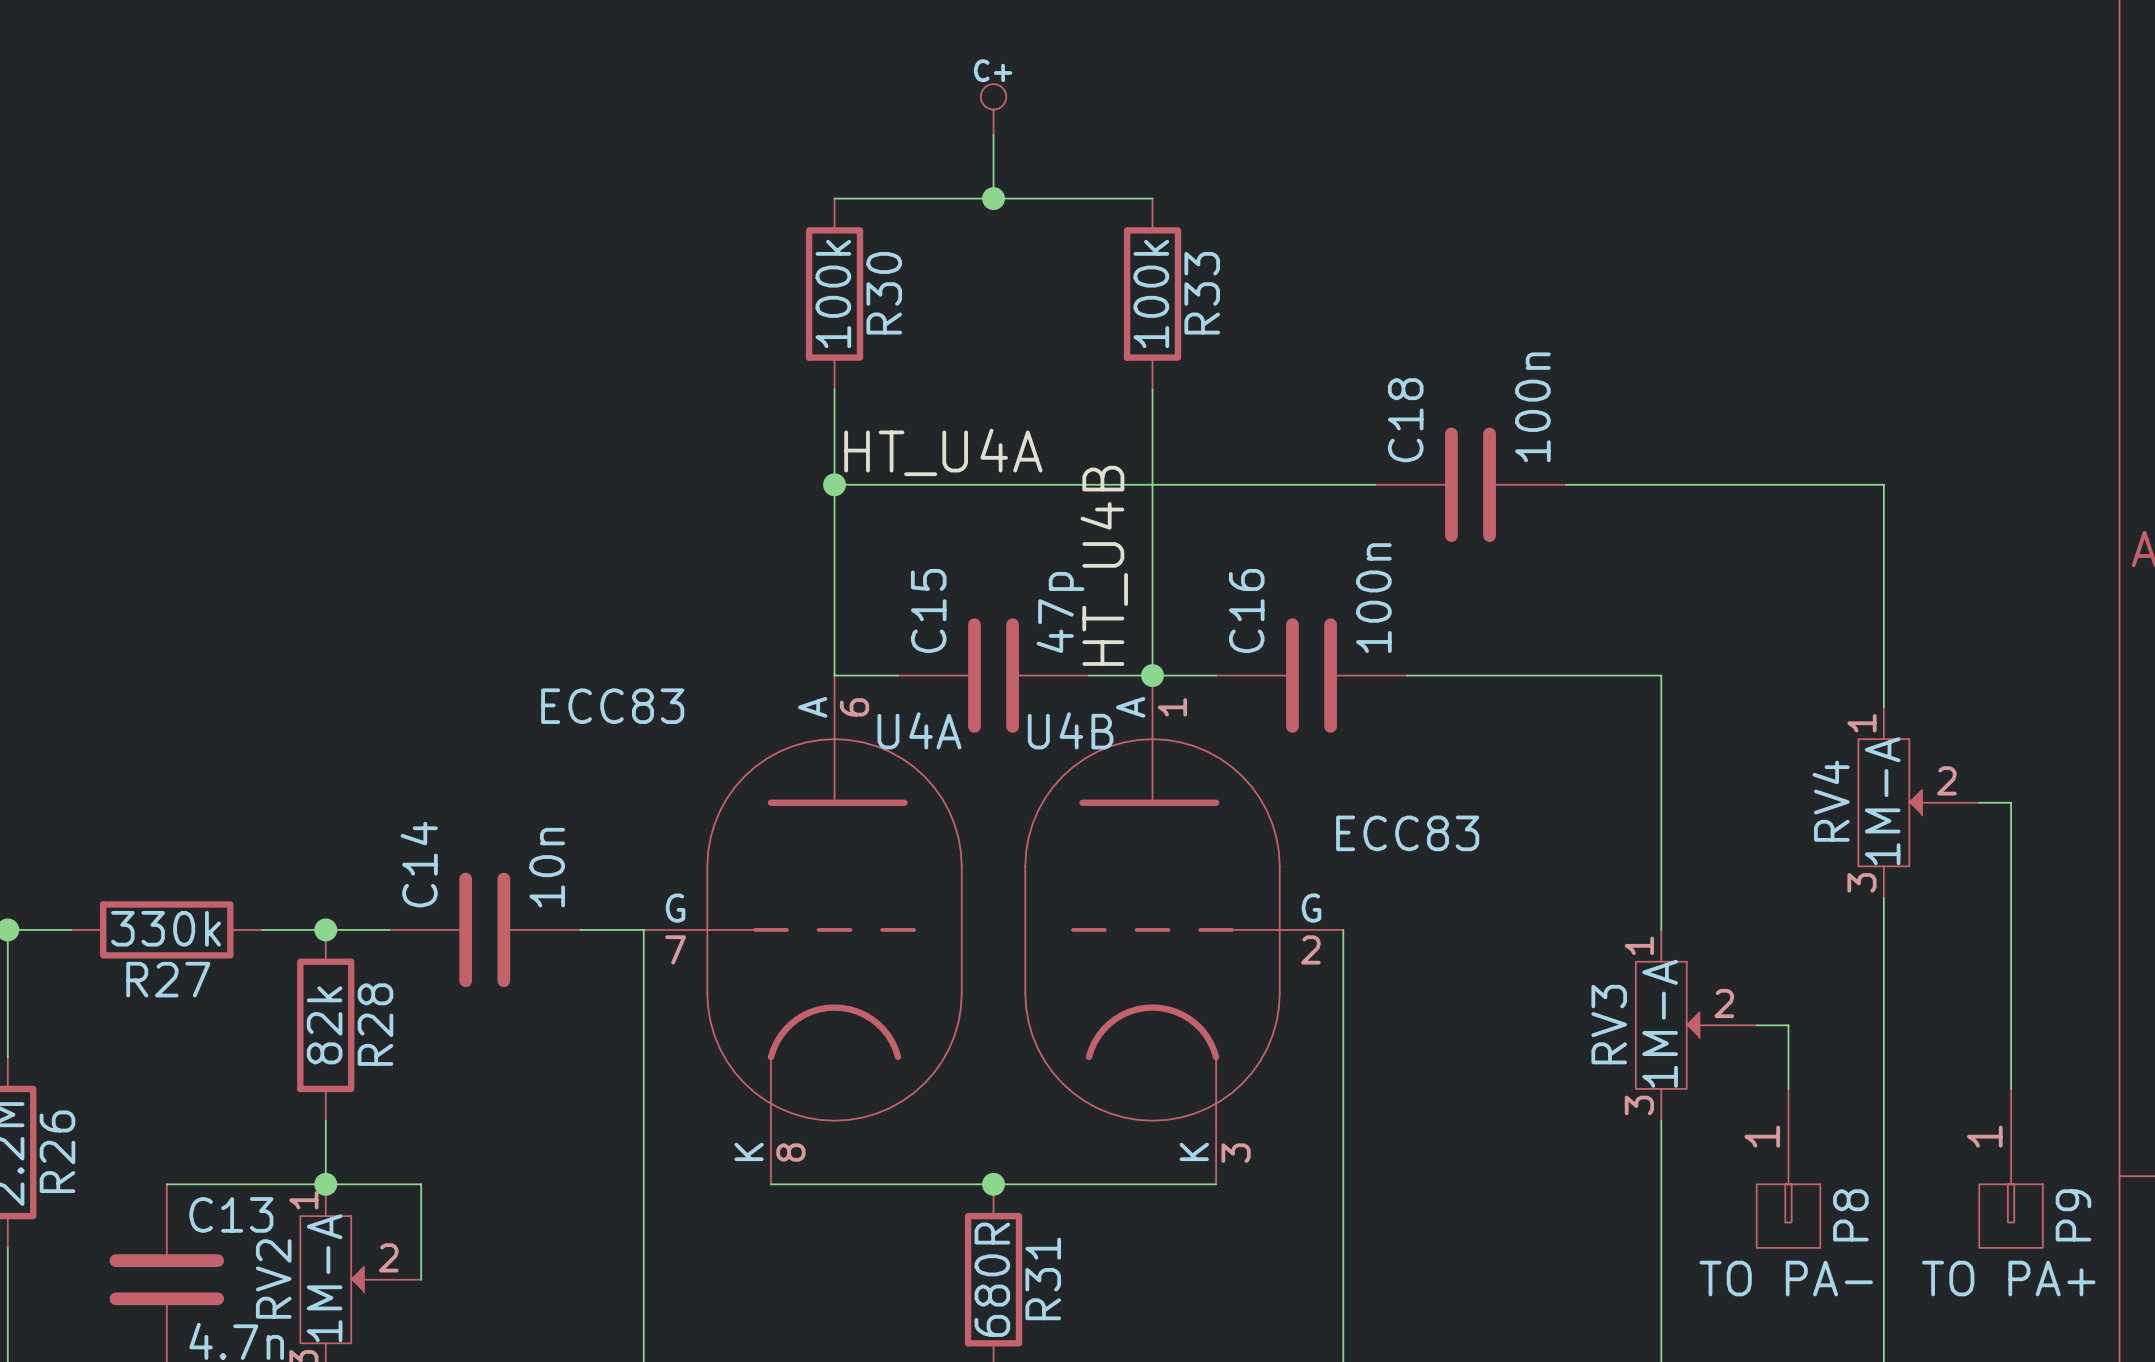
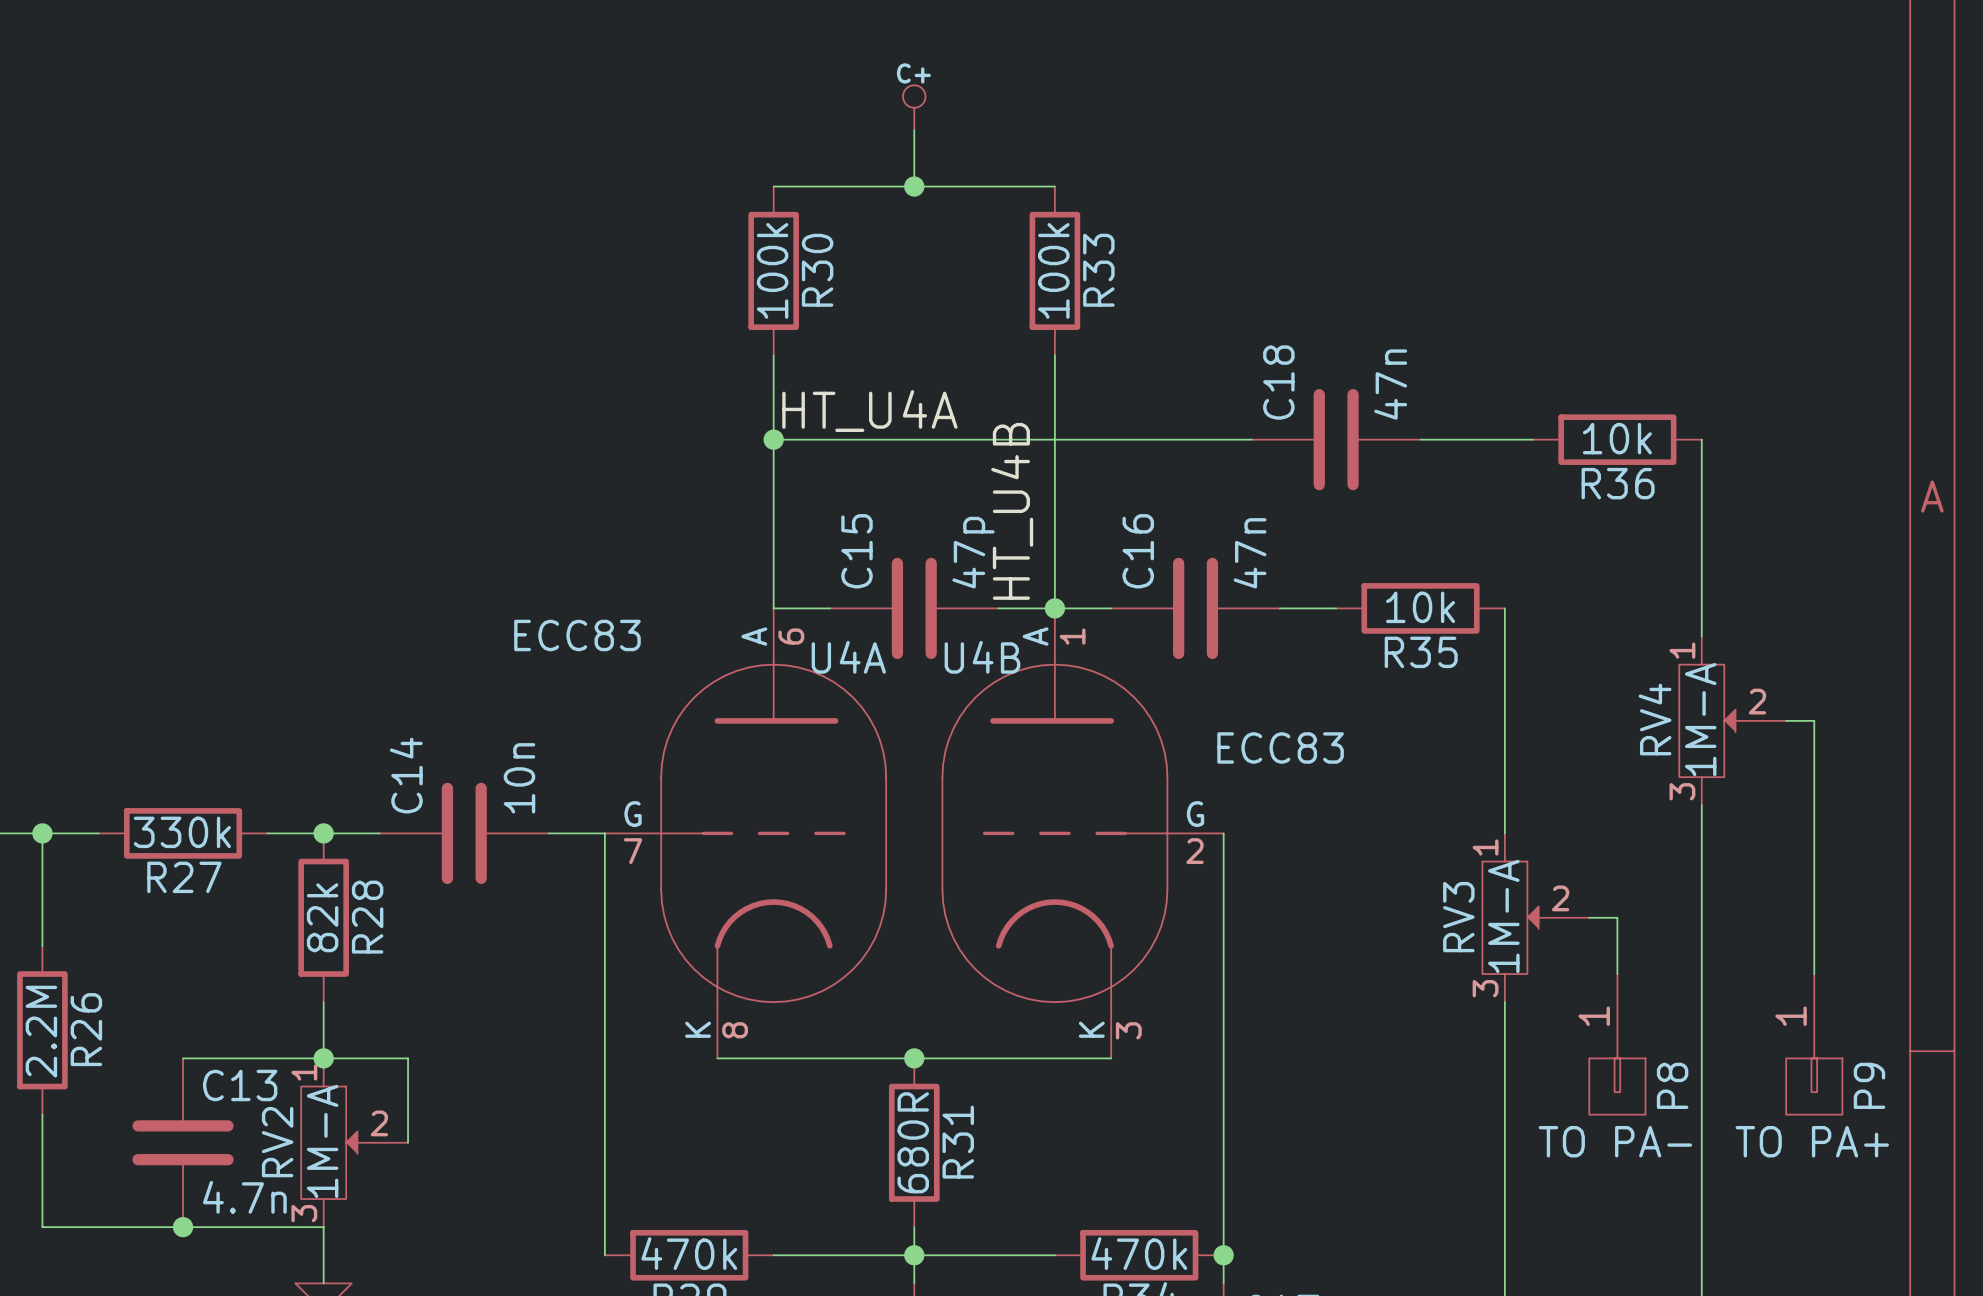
C18 value: 100n (1532, 407) -> 47n (1390, 384)
wire: (1693, 484) (1883, 484) -> none
R36: none -> 10k (1617, 439)
C16 value: 100n (1373, 598) -> 47n (1250, 553)
wire: (1470, 675) (1661, 675) -> none
R35: none -> 10k (1420, 608)

